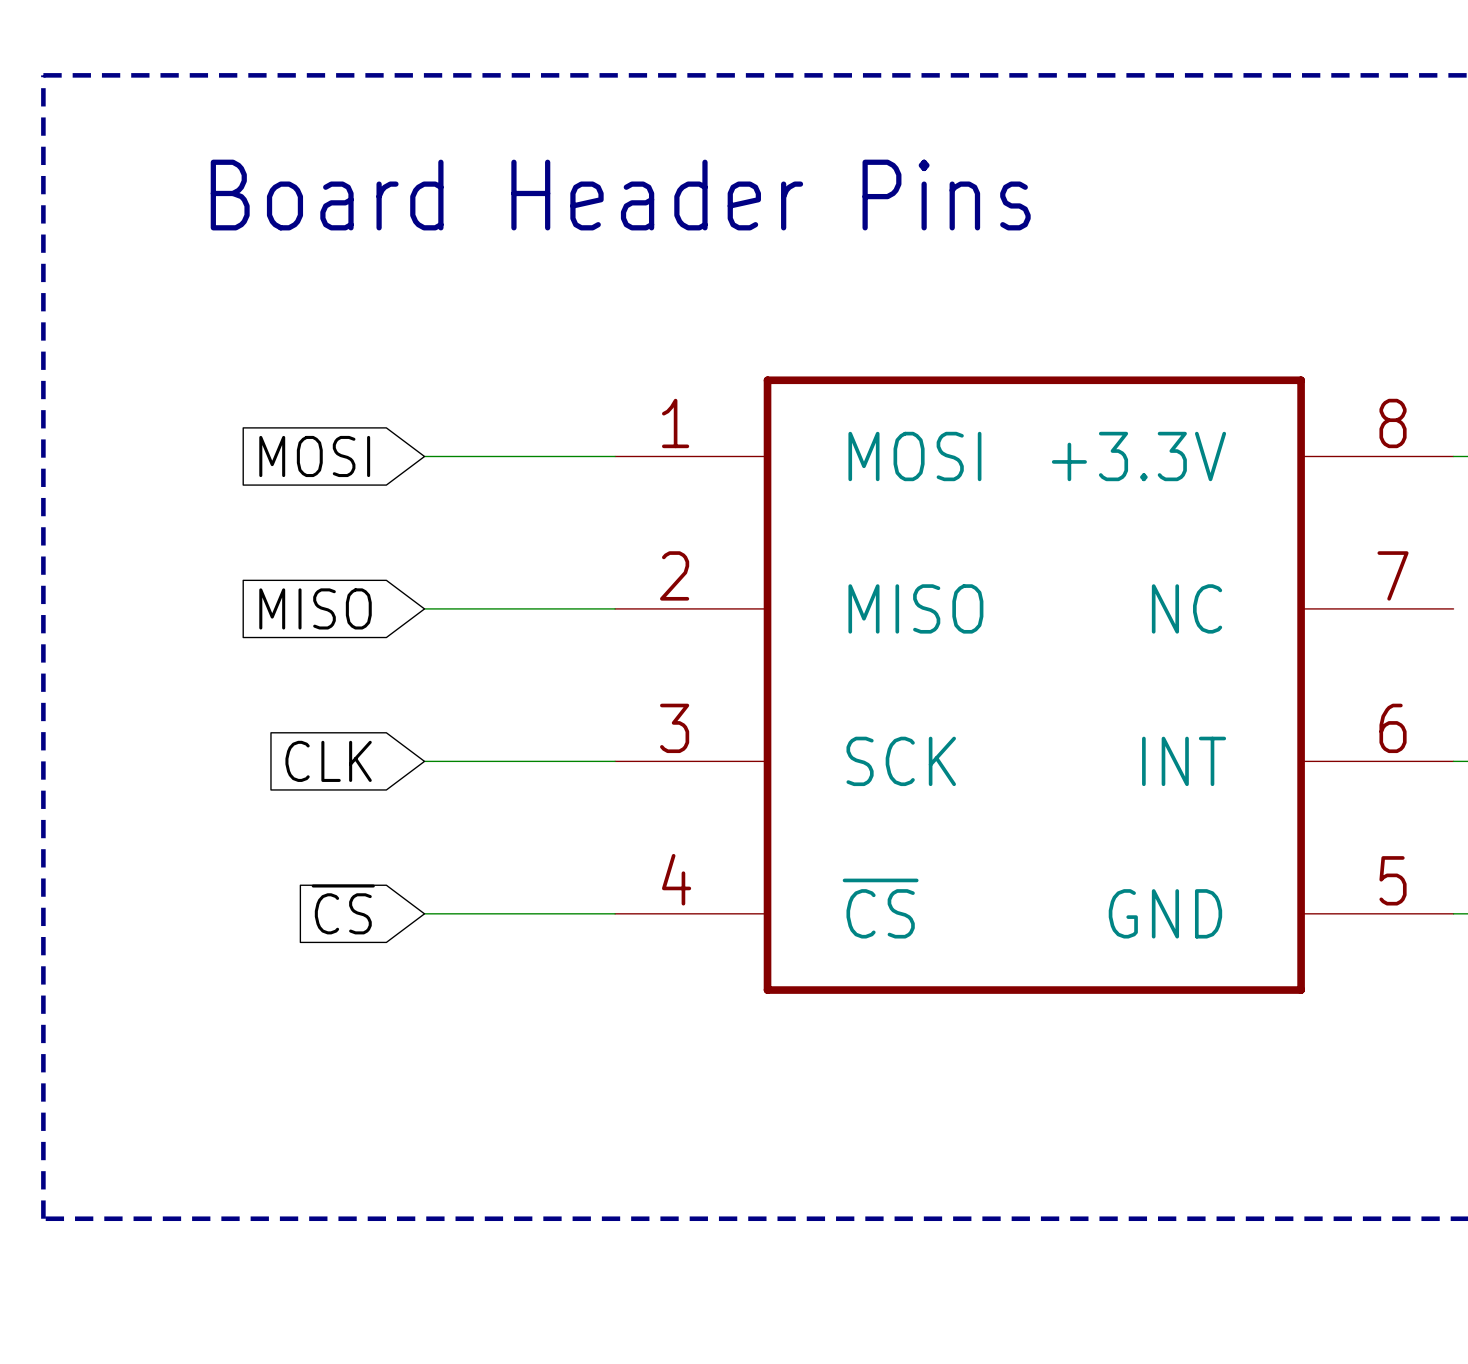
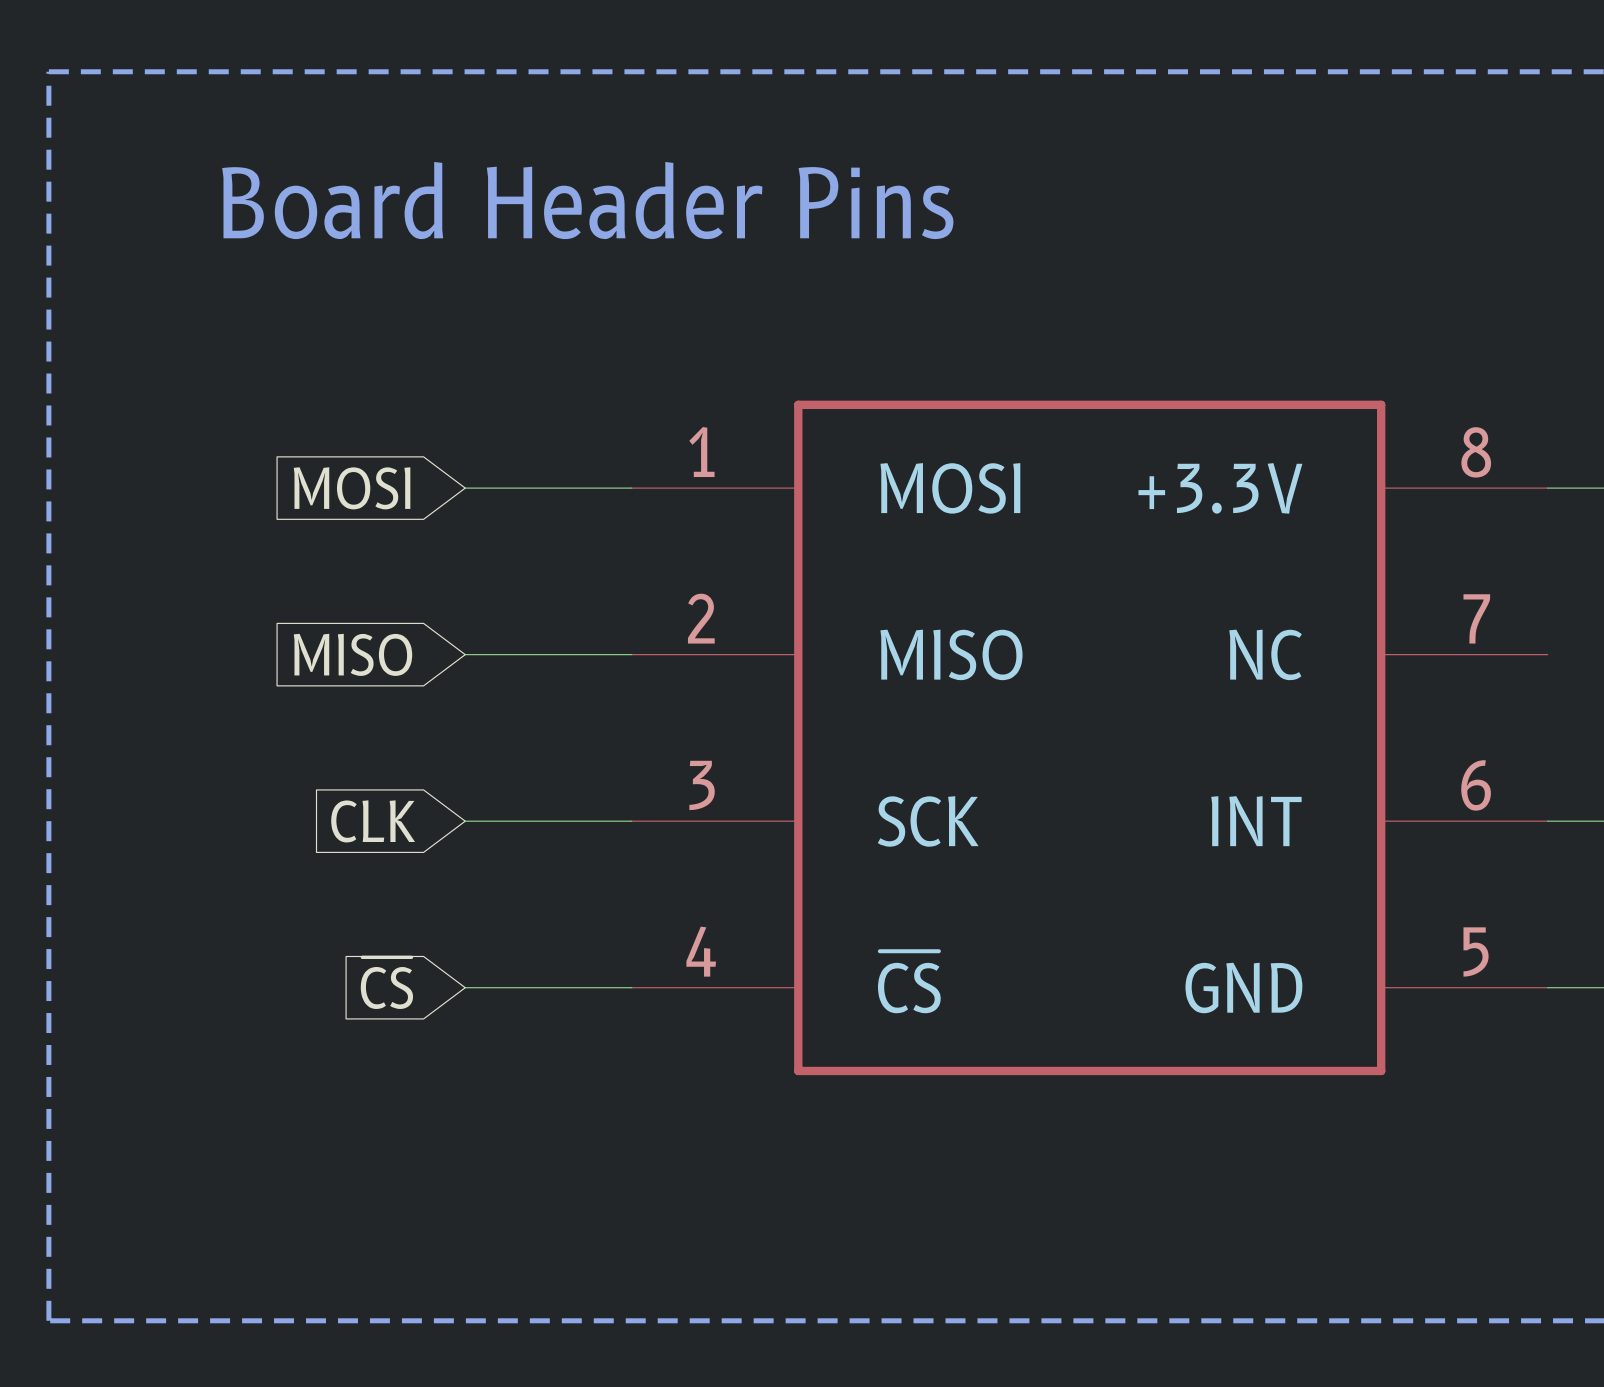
part position: (1034, 685) -> (1089, 737)

